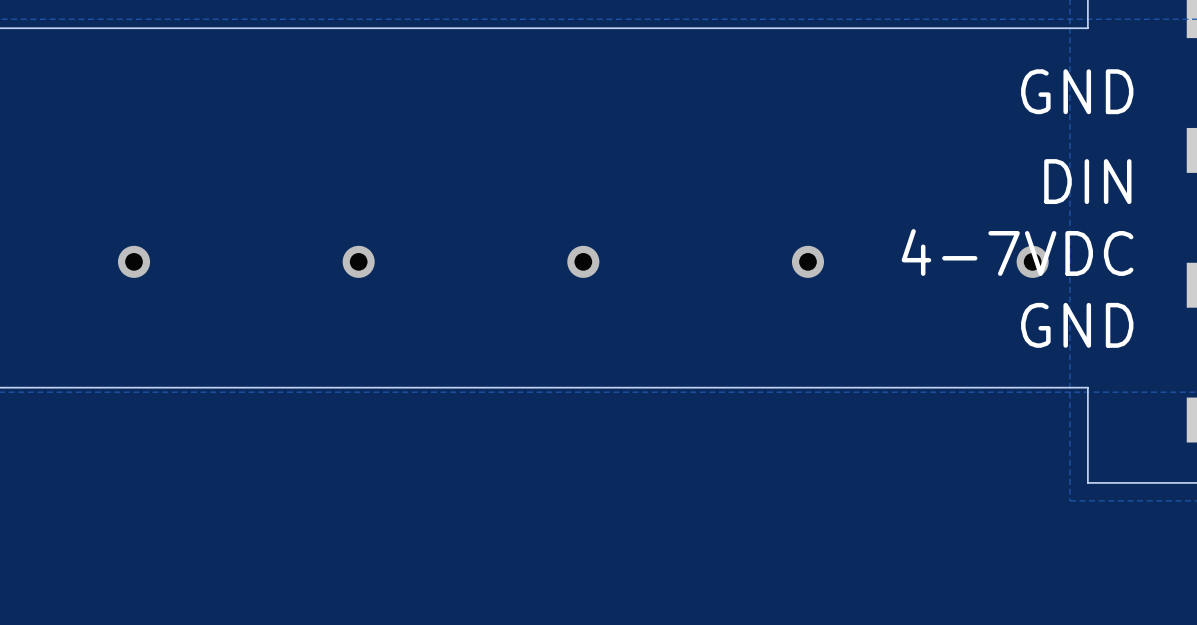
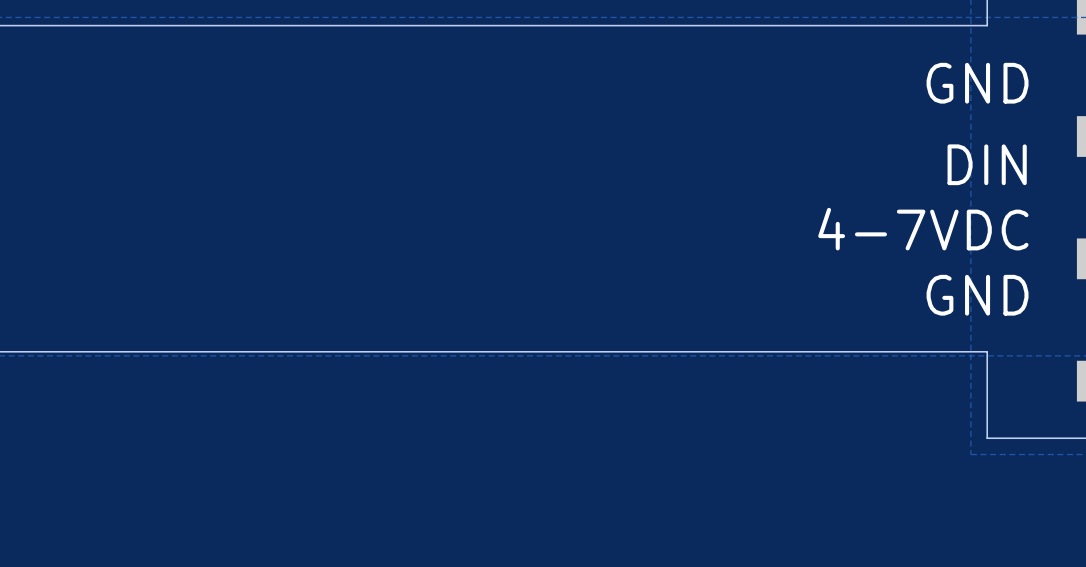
via: (134, 261) -> none
via: (358, 261) -> none
via: (583, 261) -> none
via: (807, 261) -> none
via: (1032, 261) -> none

